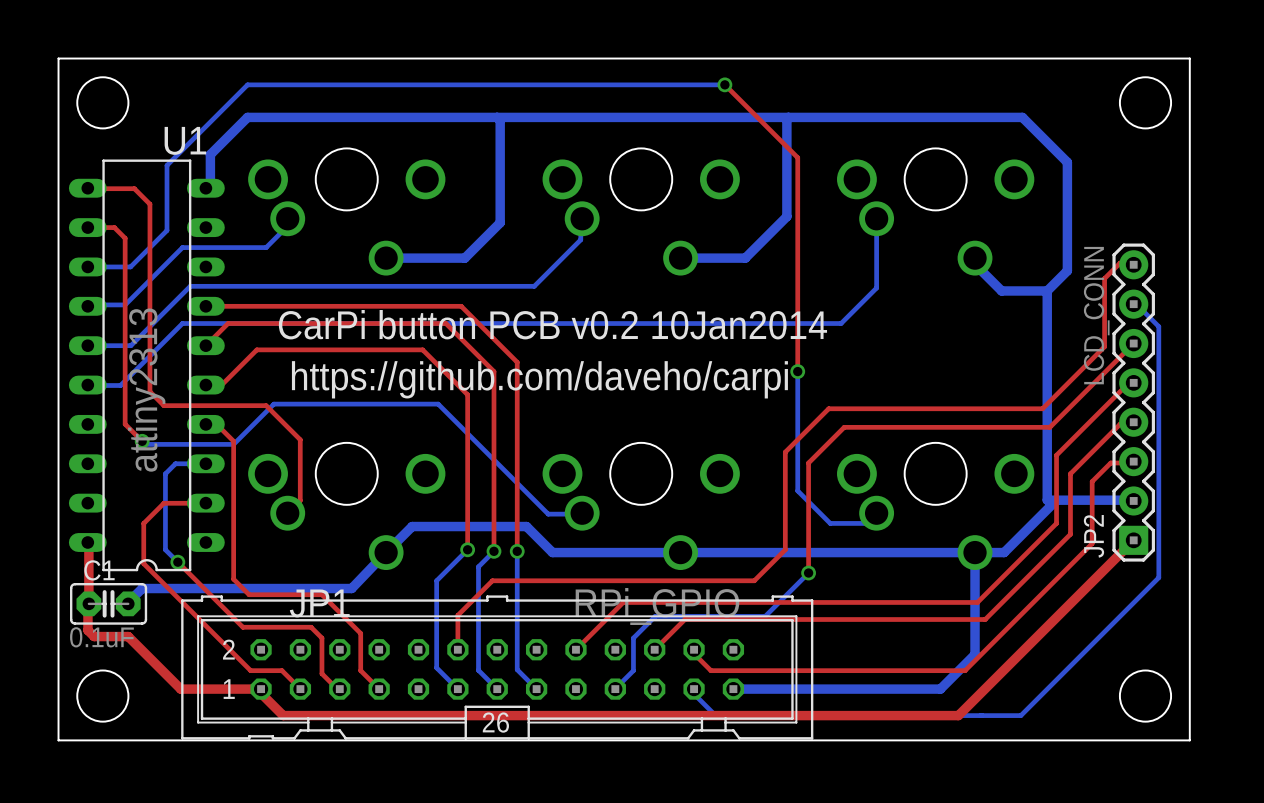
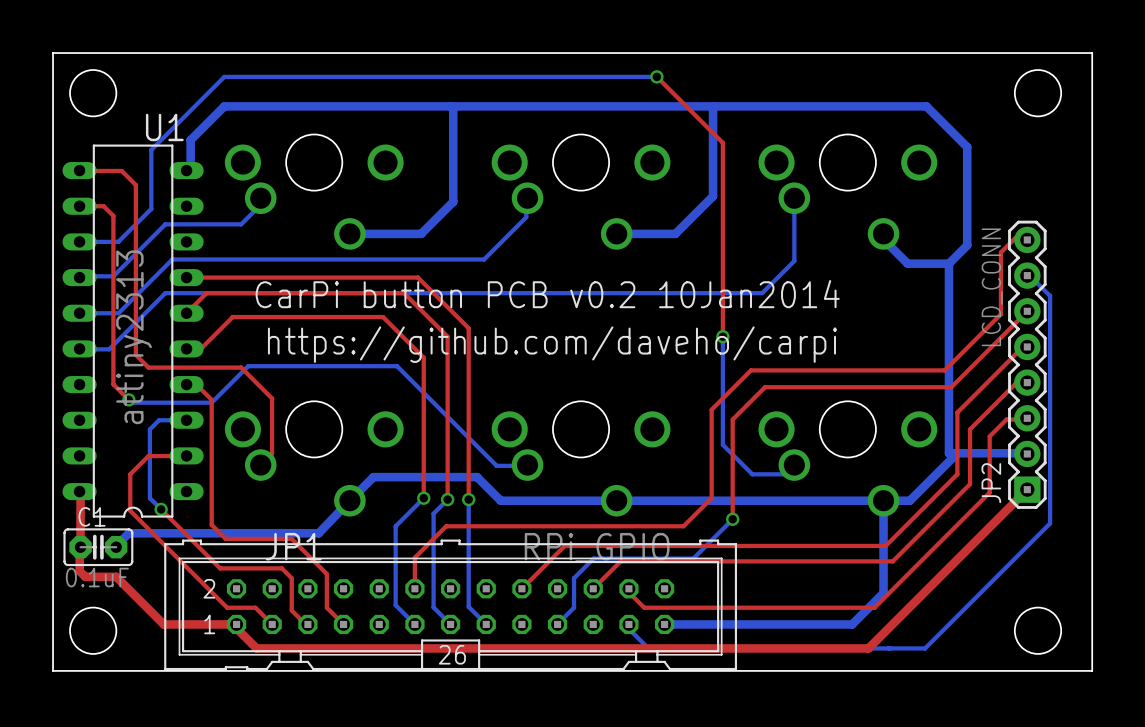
board edge: (1189, 58) (1189, 740) -> (1078, 53) (1092, 53) (1092, 670) (1078, 670)

